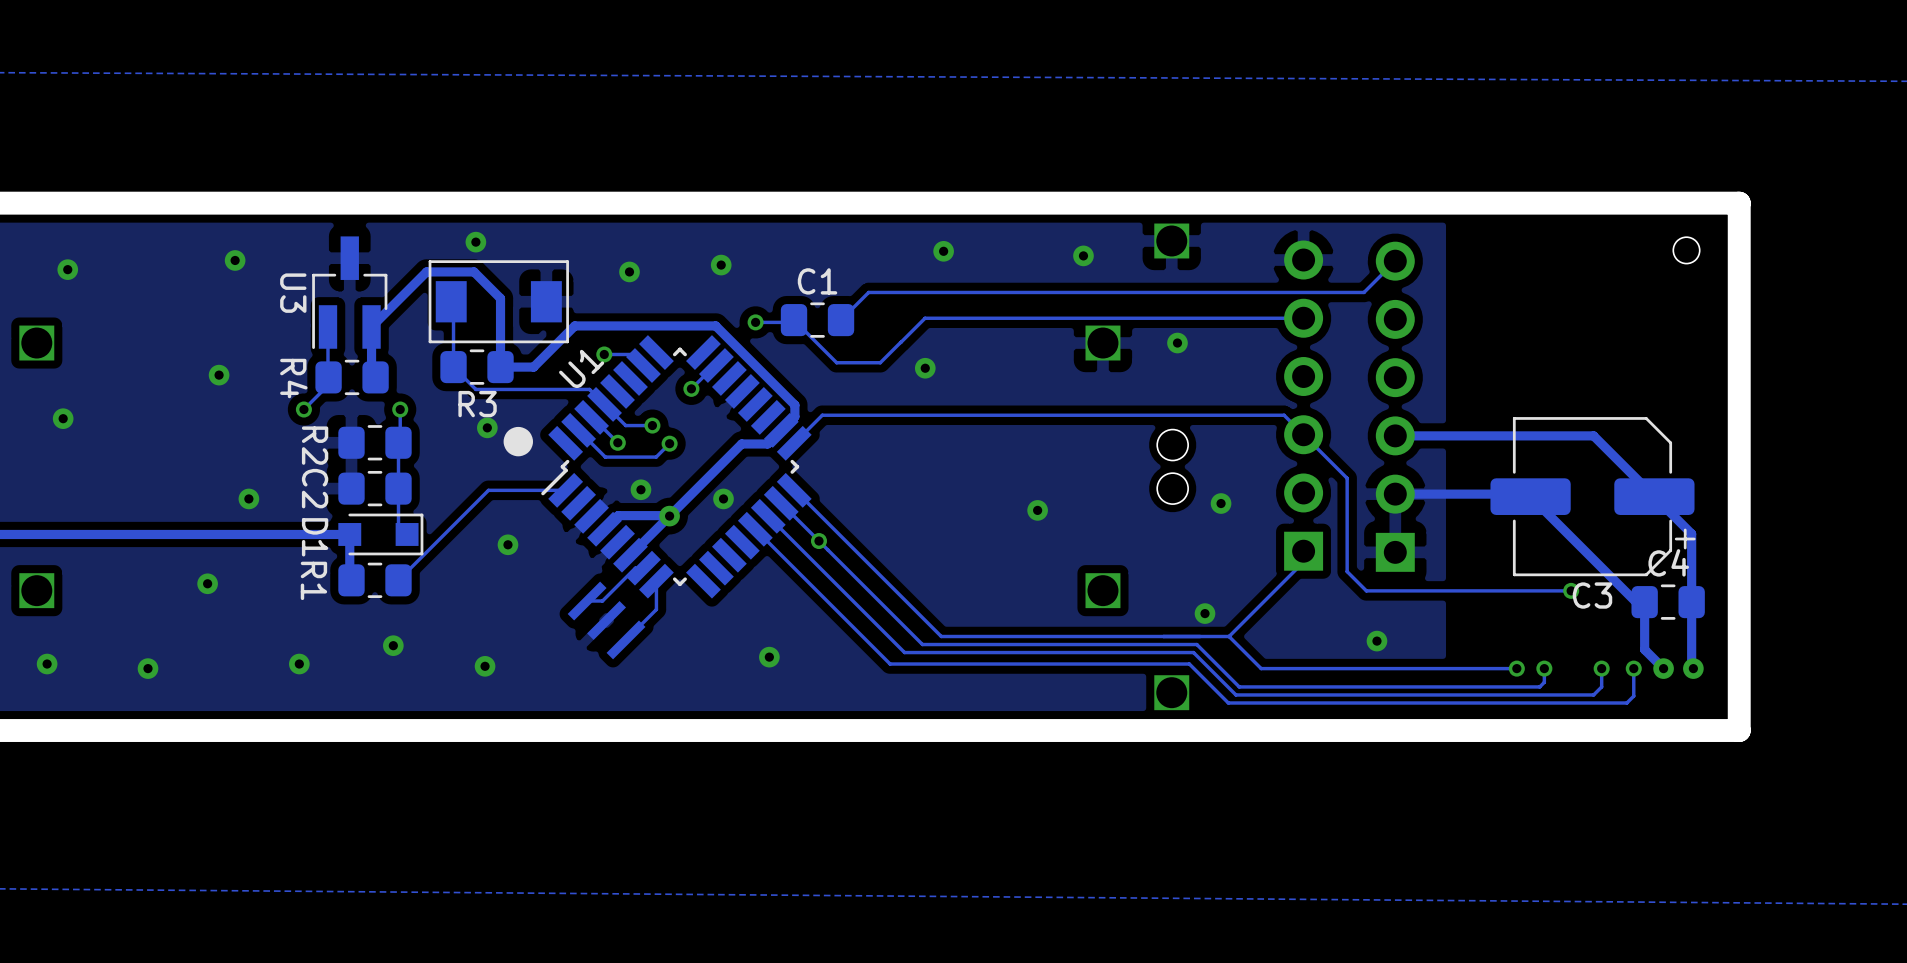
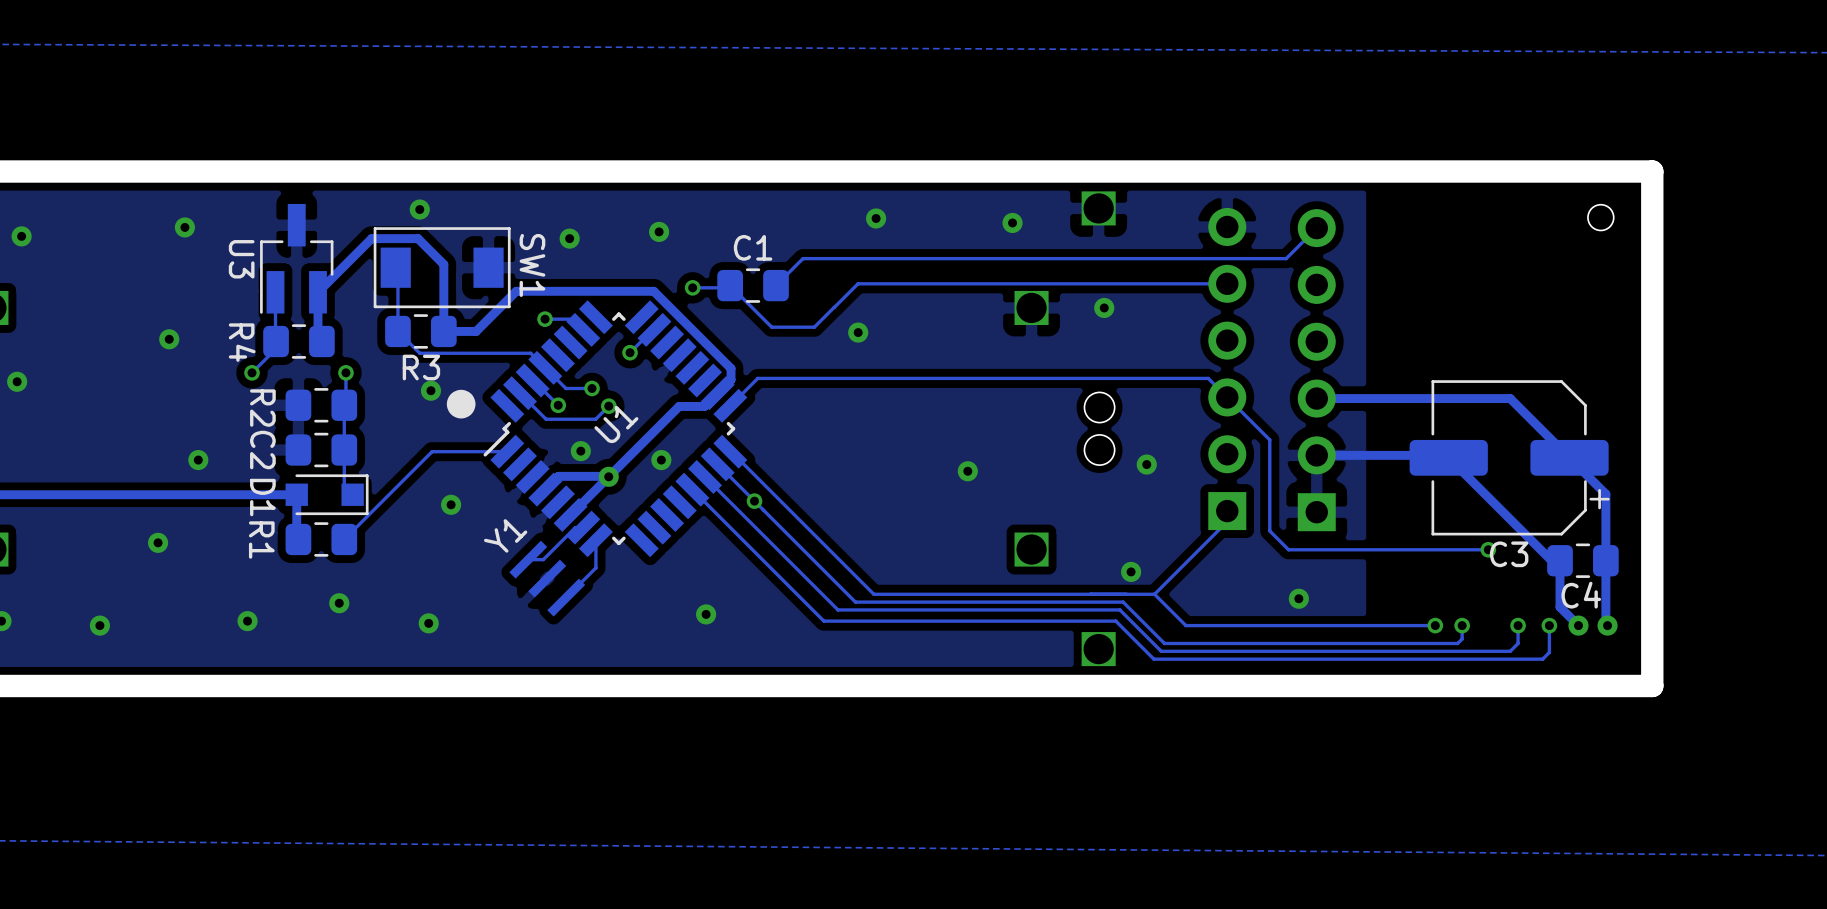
SW1 name: none -> SW1 (532, 265)
U1 name position: U1 (581, 368) -> U1 (616, 424)
C4 name position: C4 (1668, 562) -> C4 (1581, 595)
Y1 name: none -> Y1 (505, 535)

